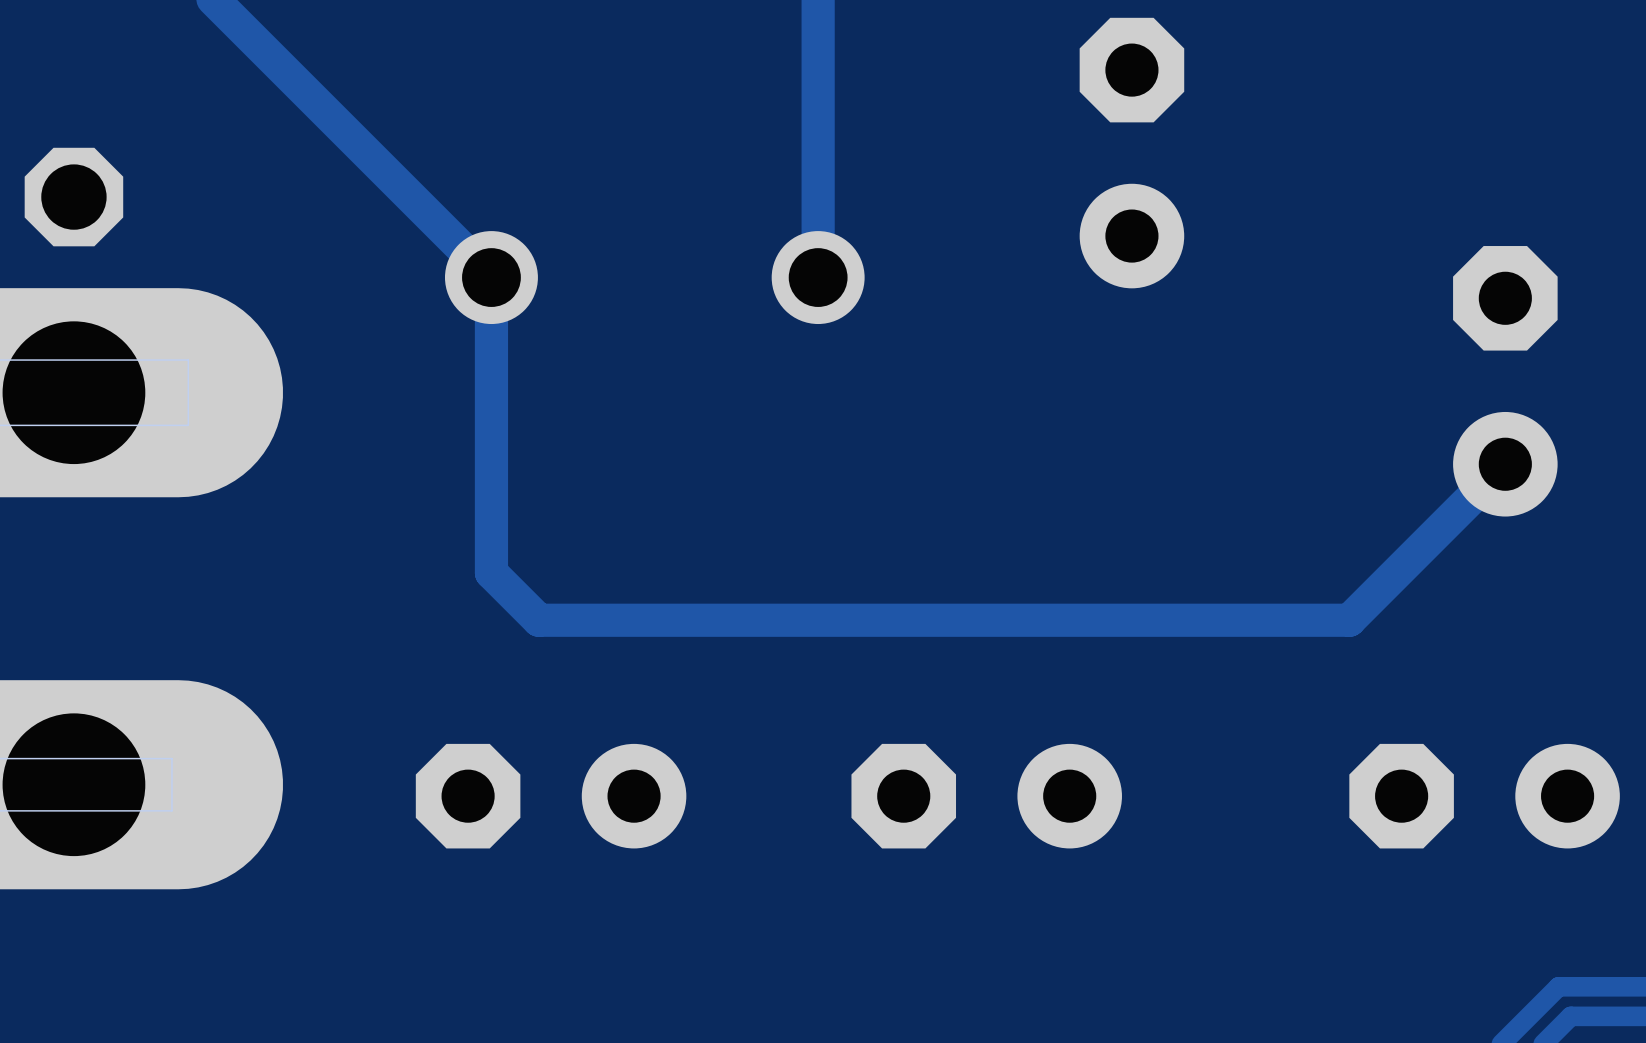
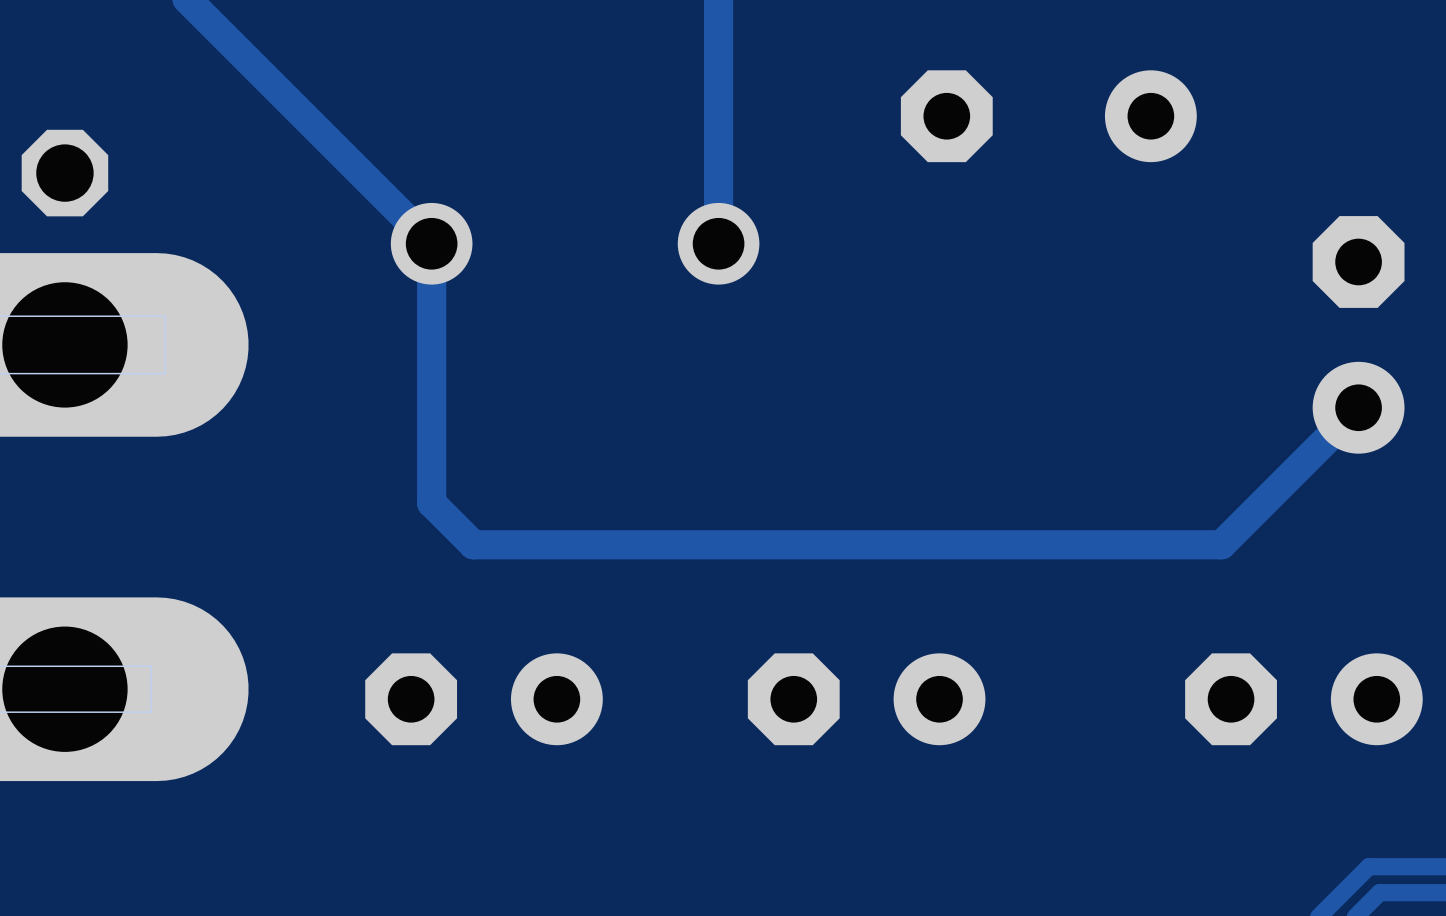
part: none -> (1048, 116)
part: (1131, 153) -> none
part position: (1505, 381) -> (1358, 334)
track: (1505, 464) (1349, 620) -> (1358, 407) (1221, 544) (1185, 544)

